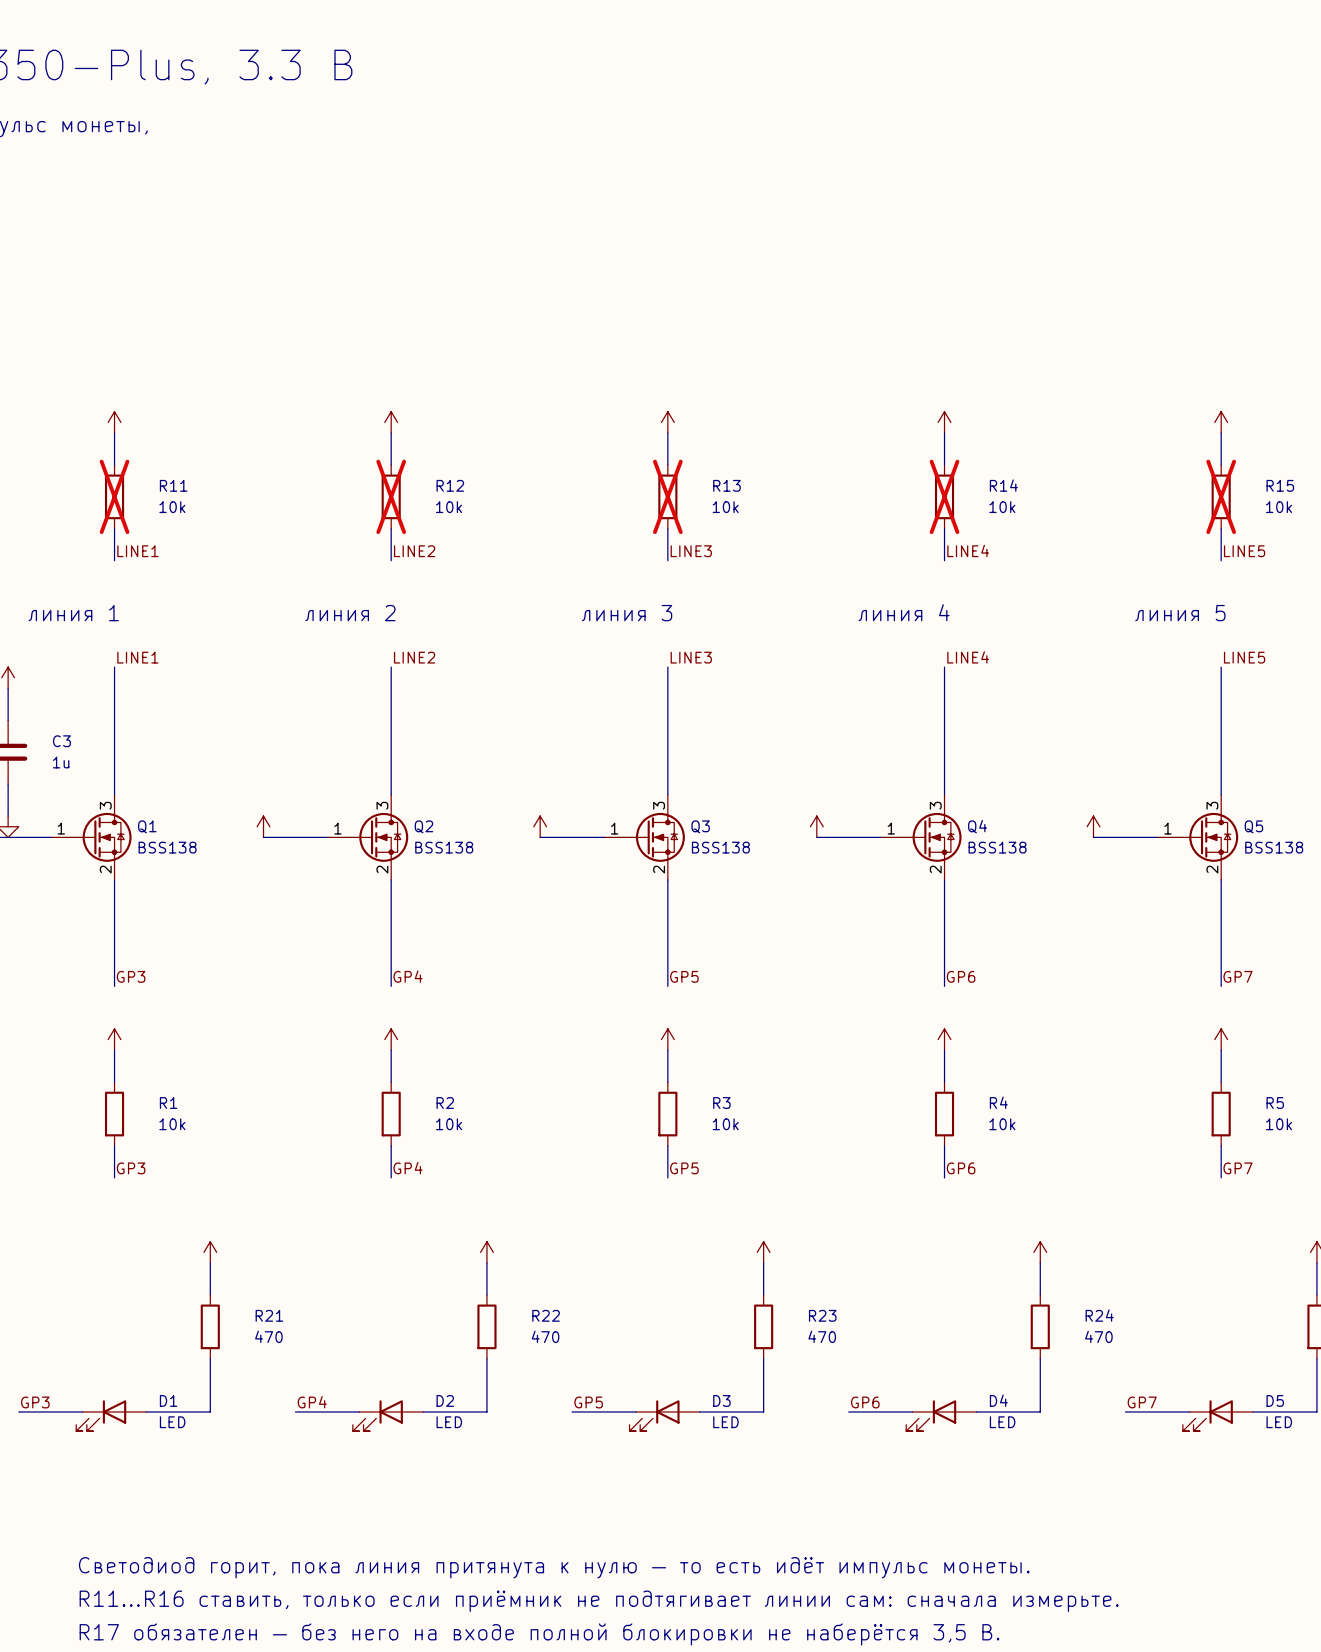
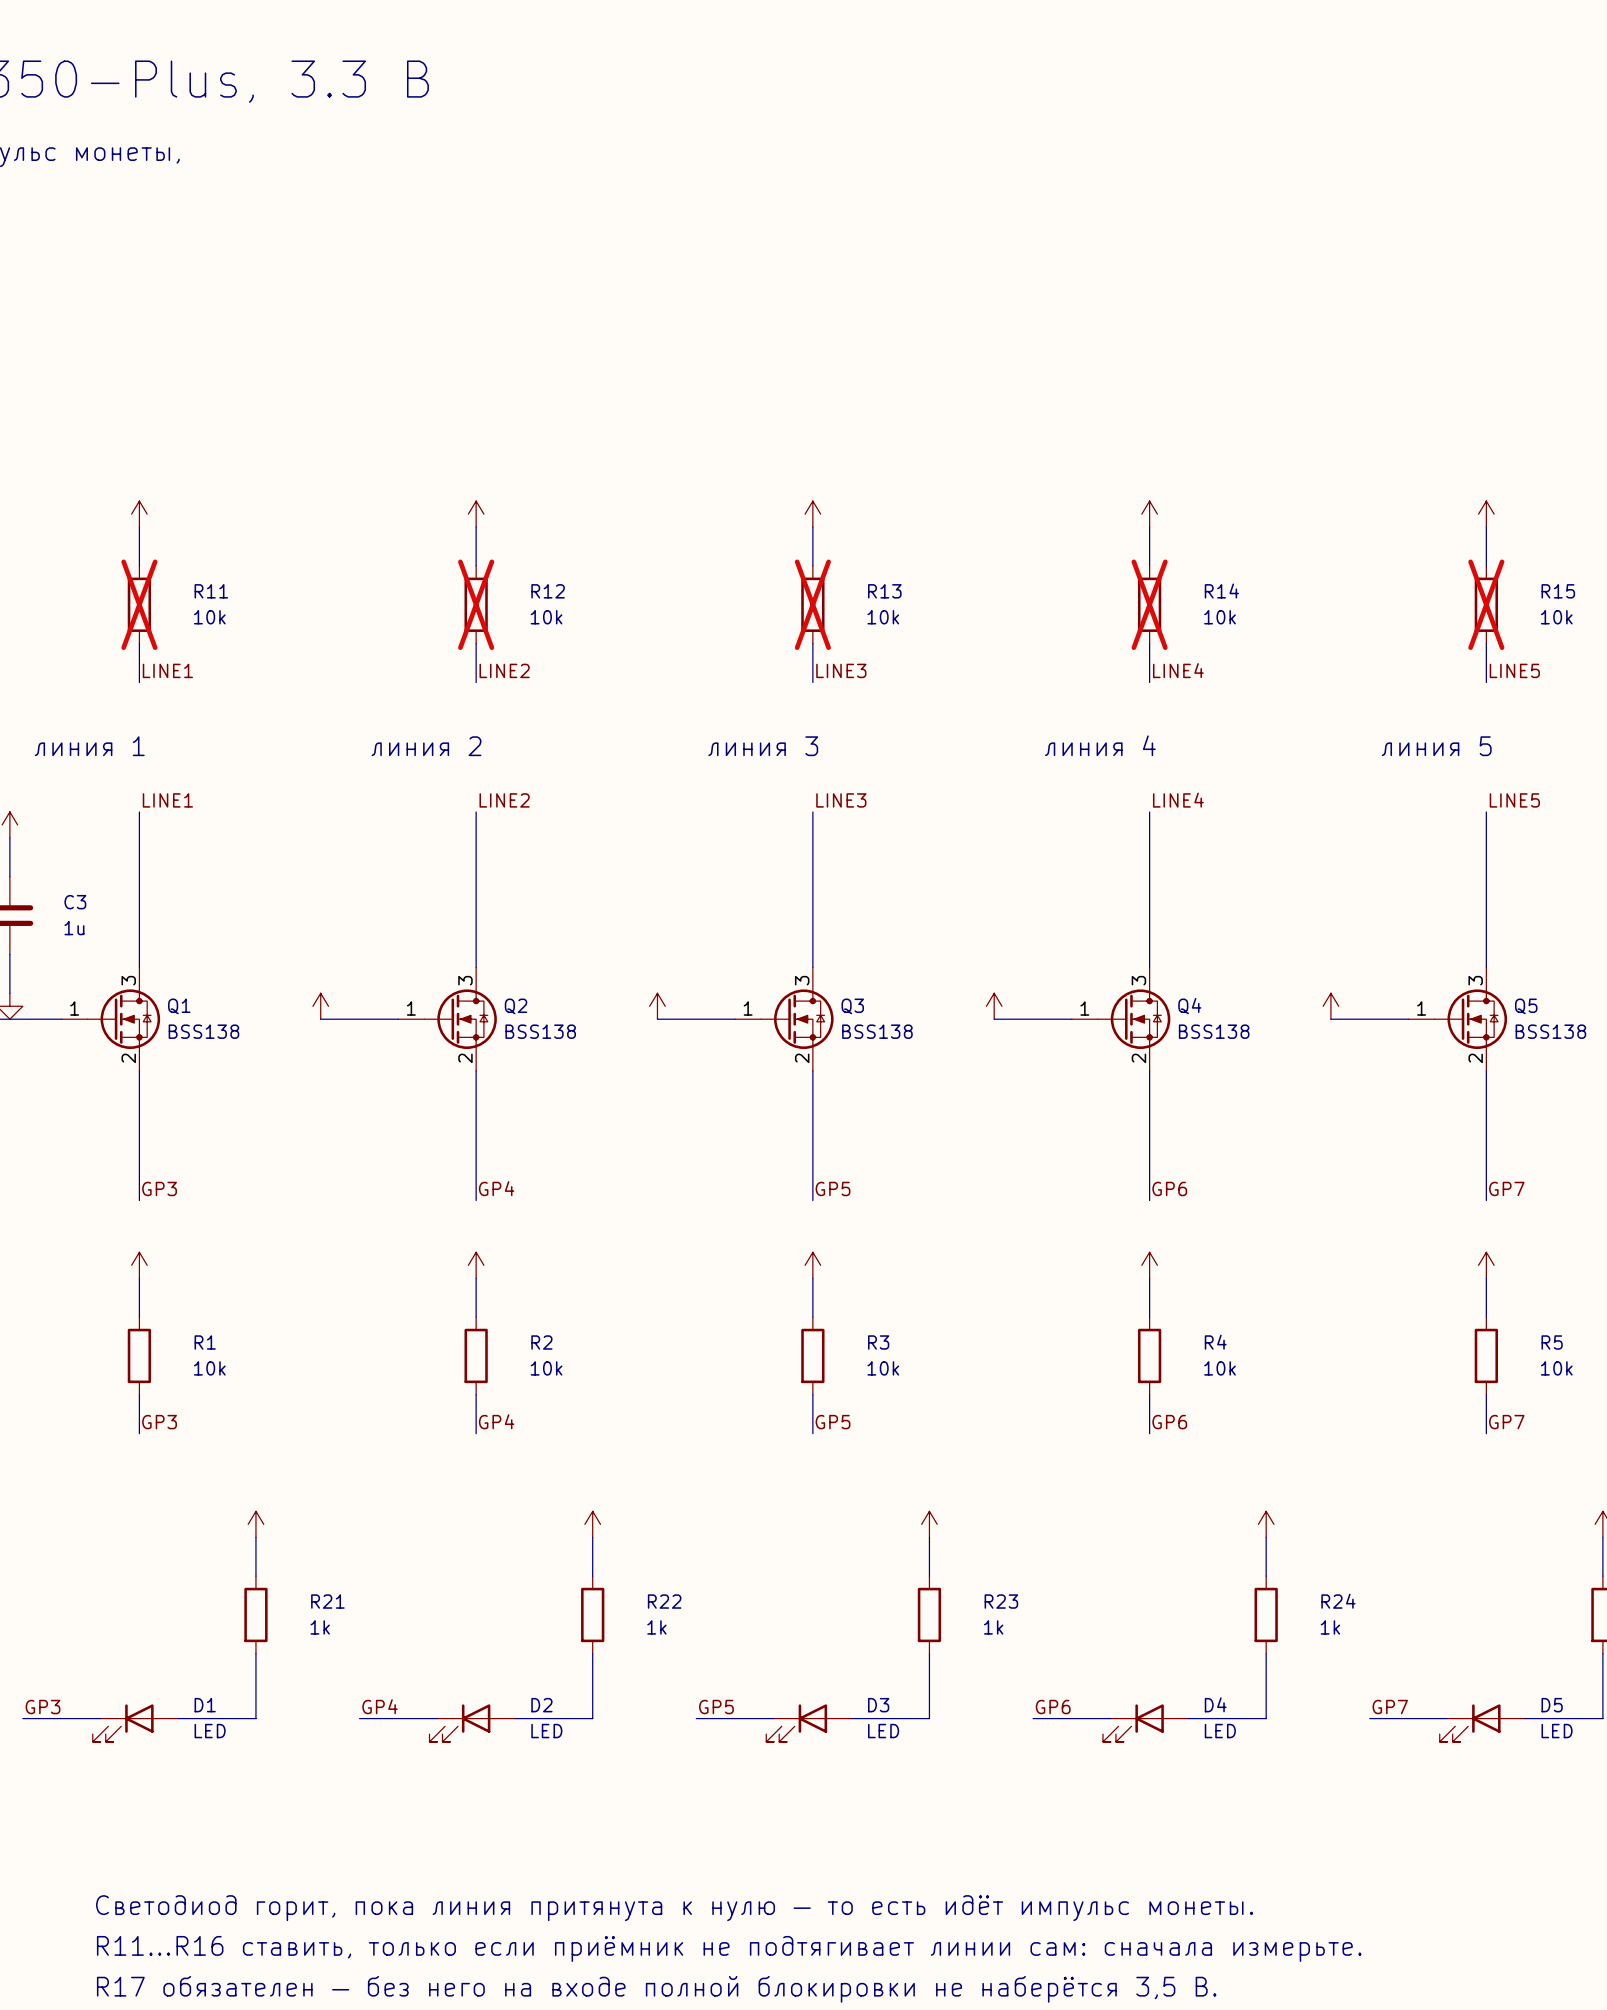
R21 value: 470 (268, 1336) -> 1k (320, 1627)
R22 value: 470 (545, 1336) -> 1k (656, 1627)
R23 value: 470 (822, 1336) -> 1k (993, 1627)
R24 value: 470 (1098, 1336) -> 1k (1330, 1627)

